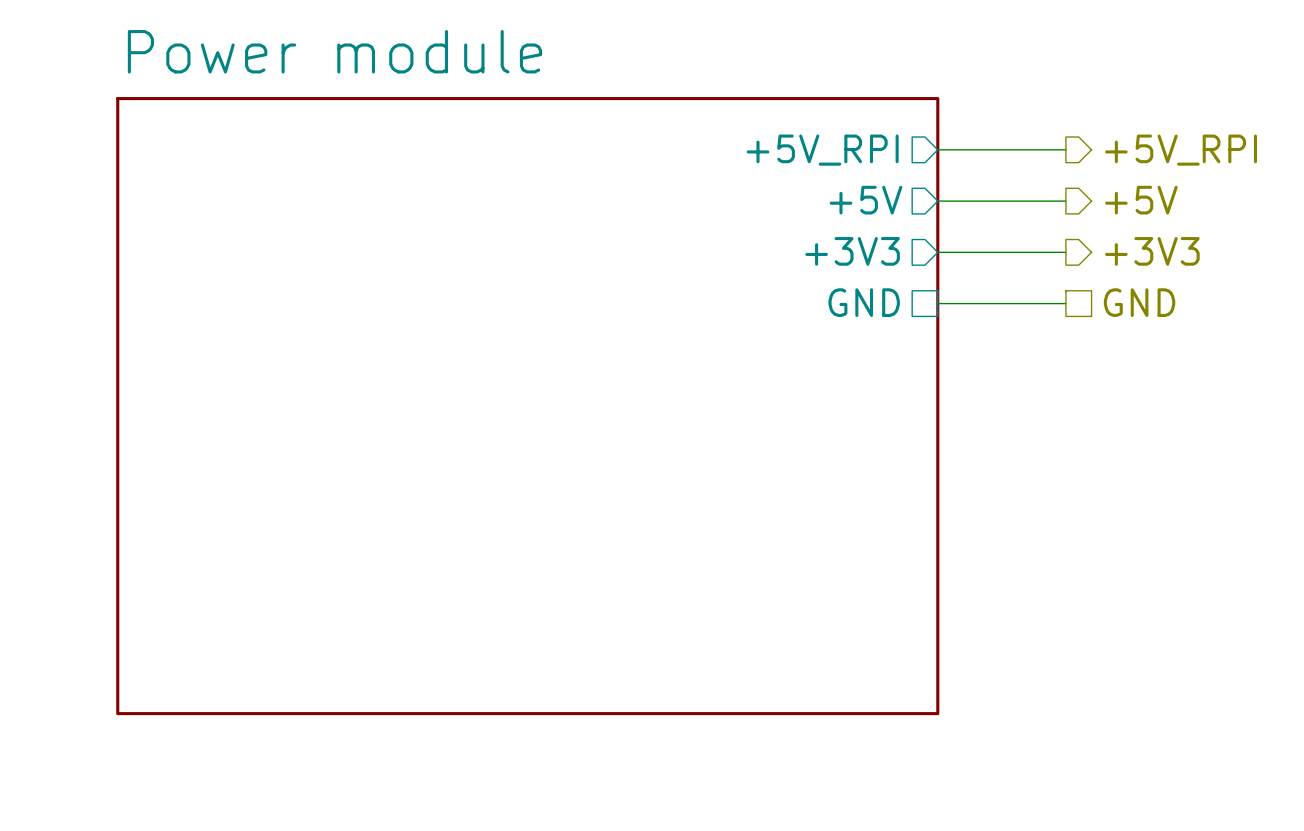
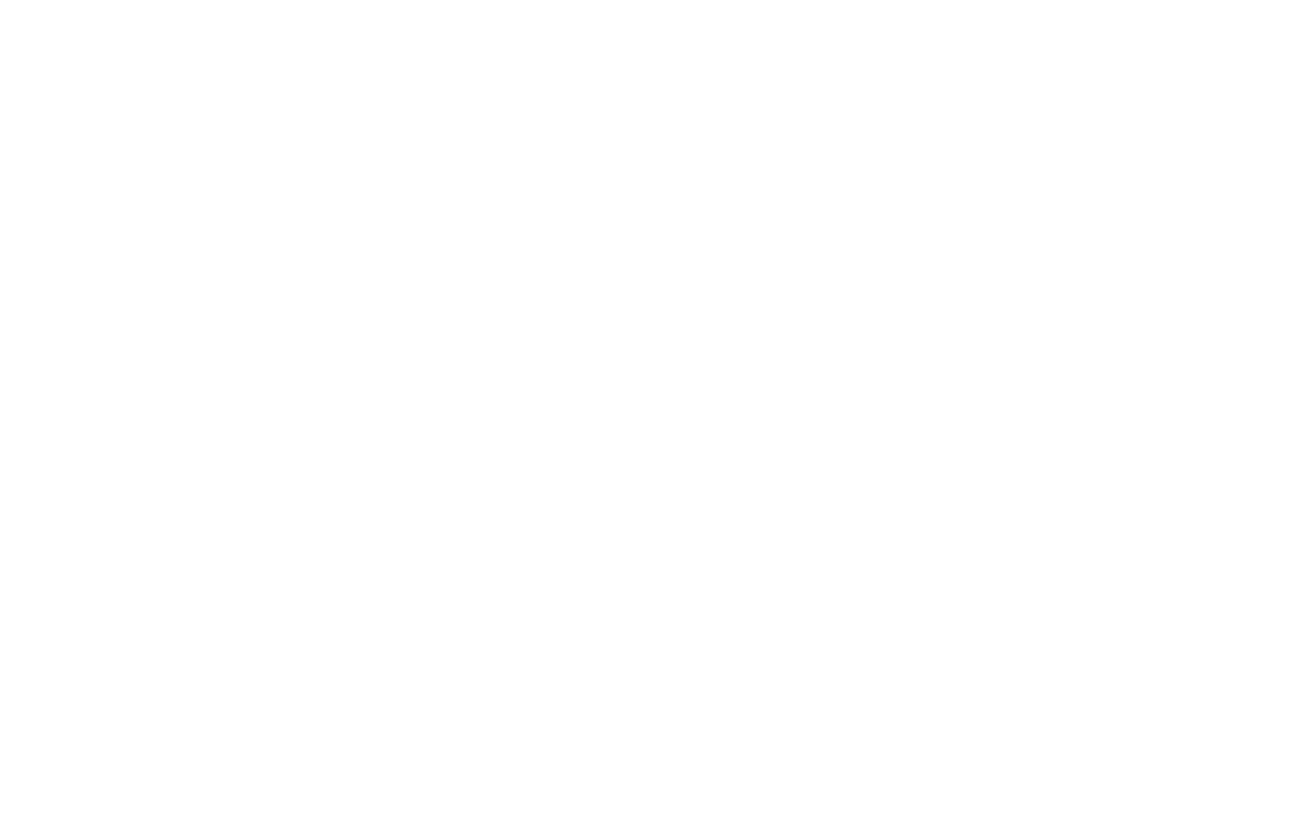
wire: (937, 149) (1065, 149) -> none
sheet pin: +5V_RPI (822, 150) -> none
hierarchical label: +5V_RPI (1181, 150) -> none
sheet pin: +5V (866, 200) -> none
hierarchical label: +5V (1141, 200) -> none
wire: (937, 201) (1065, 201) -> none
sheet pin: +3V3 (852, 251) -> none
hierarchical label: +3V3 (1152, 251) -> none
wire: (937, 252) (1065, 252) -> none
sheet pin: GND (864, 302) -> none
hierarchical label: GND (1139, 302) -> none
wire: (937, 303) (1065, 303) -> none
sheet Power module: (527, 406) -> none

